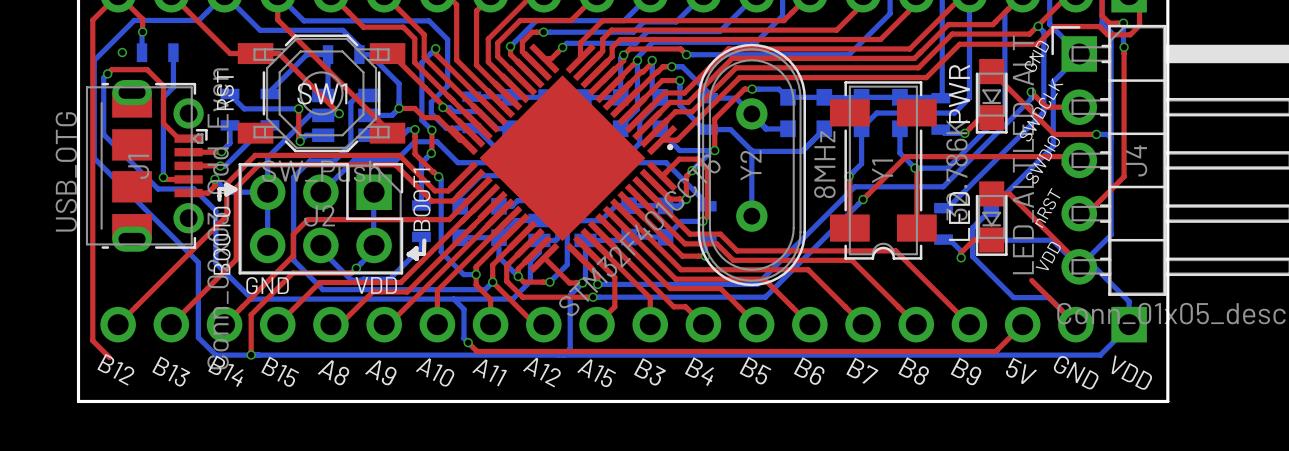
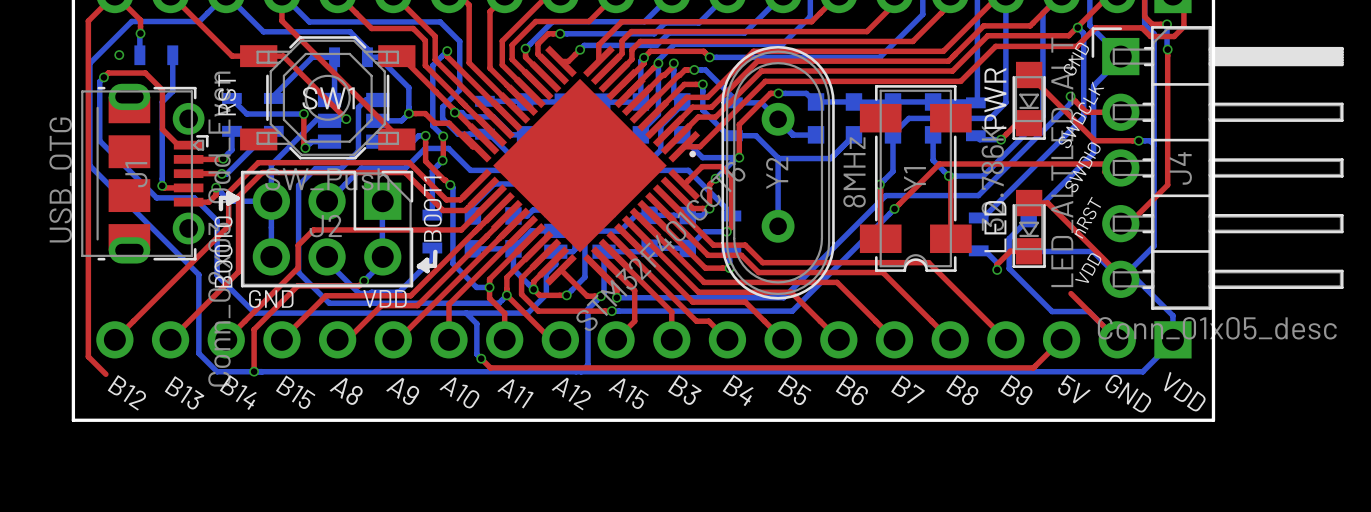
text rotation: 0° (115, 369) -> 5.5° clockwise (126, 392)
text rotation: 0° (755, 370) -> 5.5° clockwise (794, 390)
text rotation: 0° (862, 370) -> 5.5° clockwise (908, 389)
text rotation: 0° (913, 370) -> 5.5° clockwise (962, 390)
text rotation: 0° (1021, 370) -> 5.5° clockwise (1074, 389)
text rotation: 0° (171, 371) -> 5.5° clockwise (184, 392)
text rotation: 0° (225, 371) -> 5.5° clockwise (238, 392)
text rotation: 0° (280, 371) -> 5.5° clockwise (295, 392)
text rotation: 0° (650, 371) -> 5.5° clockwise (684, 389)
text rotation: 0° (699, 371) -> 5.5° clockwise (738, 390)
text rotation: 0° (809, 371) -> 5.5° clockwise (852, 390)
text rotation: 0° (966, 371) -> 5.5° clockwise (1016, 390)
text rotation: 0° (333, 372) -> 5.5° clockwise (346, 391)
text rotation: 0° (380, 372) -> 5.5° clockwise (402, 391)
text rotation: 0° (435, 372) -> 5.5° clockwise (459, 392)
text rotation: 0° (489, 372) -> 5.5° clockwise (515, 393)
text rotation: 0° (541, 372) -> 5.5° clockwise (571, 393)
text rotation: 0° (1076, 372) -> 5.5° clockwise (1128, 393)
text rotation: 0° (1132, 372) -> 7° clockwise (1185, 391)
text rotation: 0° (596, 373) -> 5.5° clockwise (628, 393)

